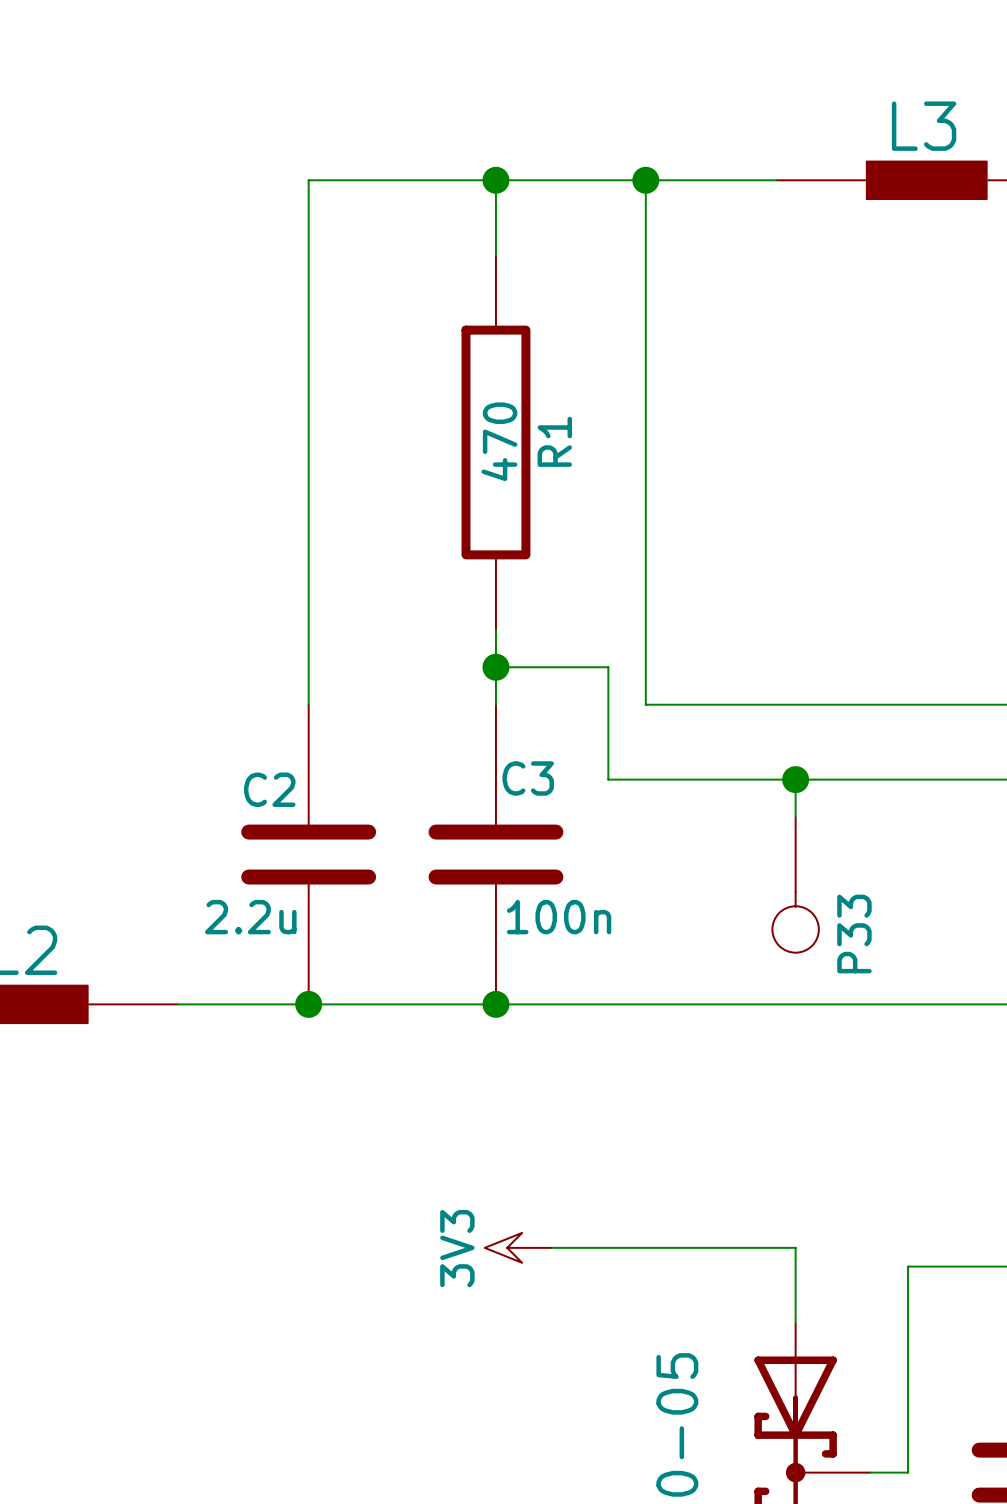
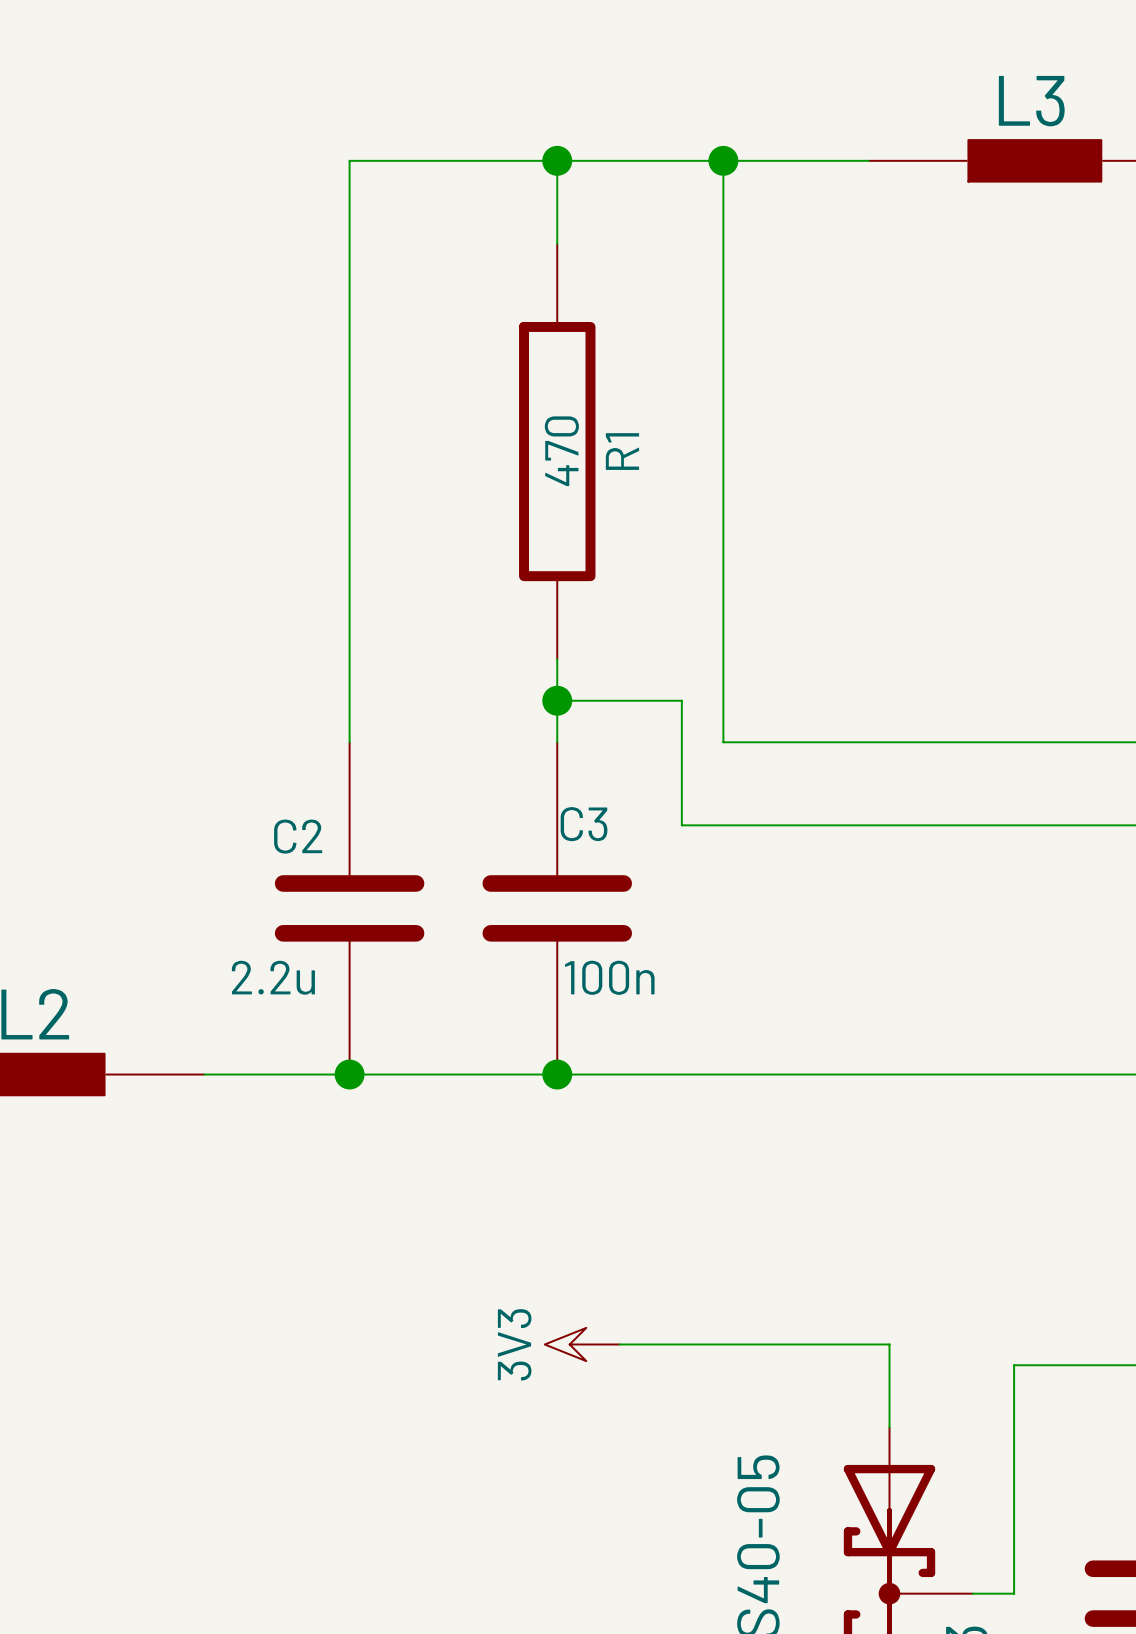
wire: (795, 779) (795, 817) -> none
junction: (795, 779) -> none
P33: (795, 884) -> none

